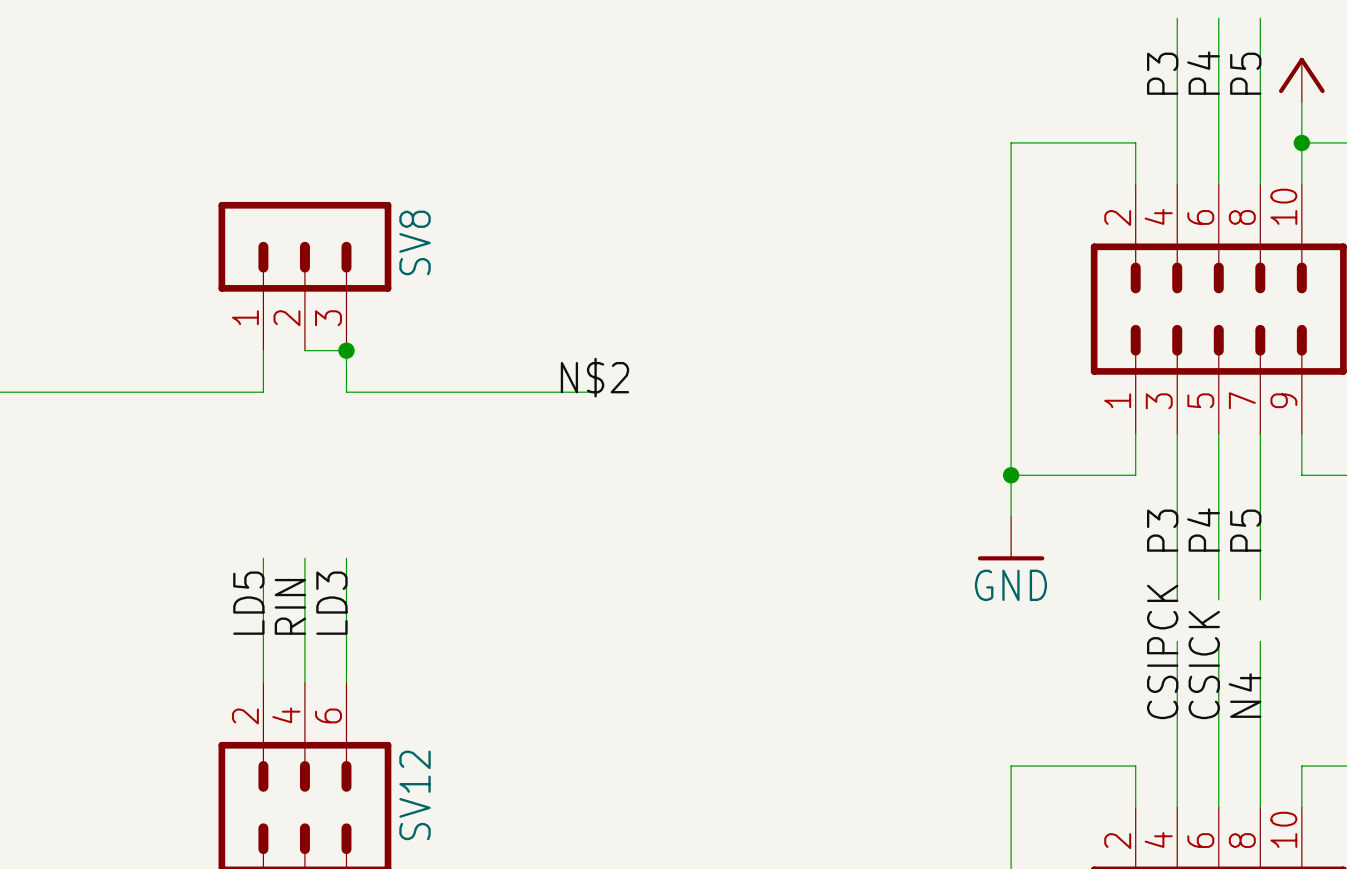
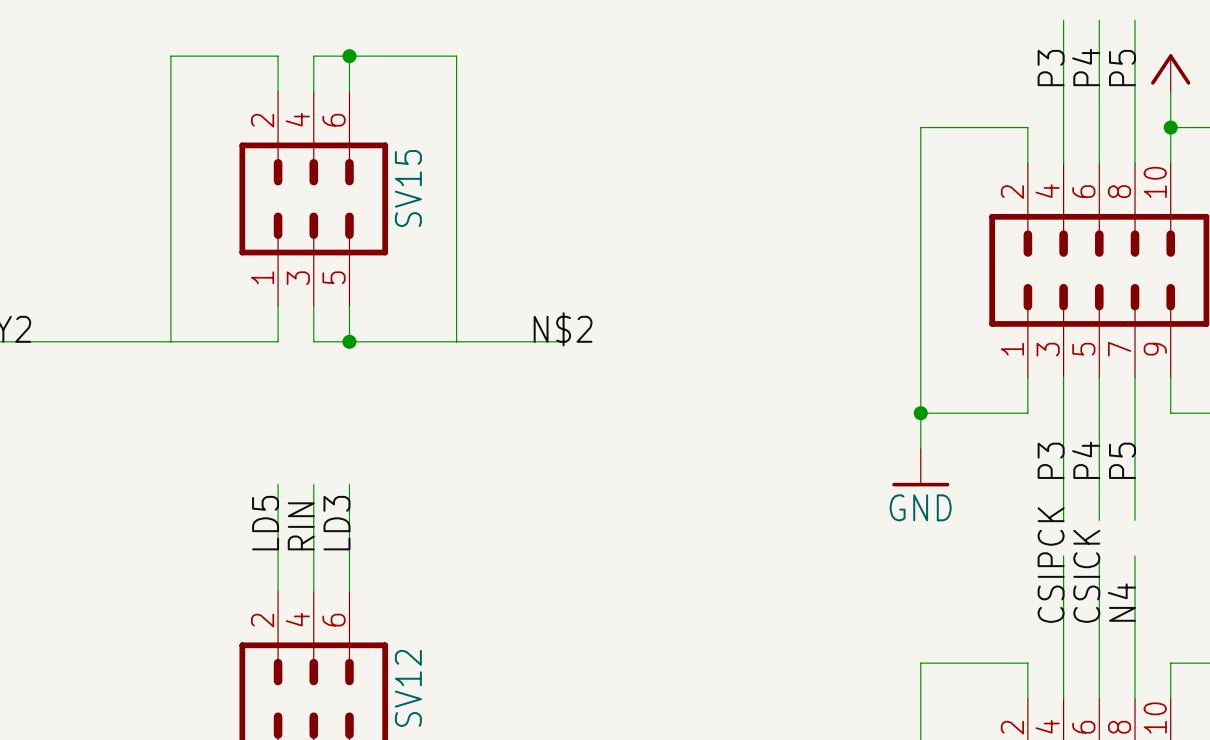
wire: none -> (349, 56) (349, 91)
junction: none -> (349, 56)
wire: none -> (278, 91) (278, 56) (170, 56) (170, 341)
wire: none -> (313, 91) (313, 56) (456, 56) (456, 341)
SV15: none -> (313, 198)
SV8: (304, 276) -> none
wire: (304, 350) (346, 350) -> (313, 306) (313, 341) (349, 341)
junction position: (346, 350) -> (349, 341)

